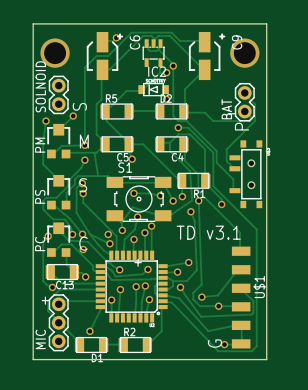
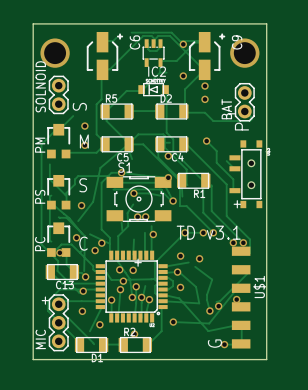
track: (131, 32) (108, 56) (96, 56) (84, 67) (84, 145) (61, 146) (51, 153) -> none
via: (116, 37) -> none
track: none -> (204, 42) (194, 42) (176, 61) (160, 62)
via: none -> (183, 44)
track: (158, 49) (173, 64) (173, 116) (178, 121) (186, 121) (206, 141) -> none
via: (173, 66) -> none
via: (166, 72) -> none
via: none -> (183, 76)
via: none -> (205, 86)
track: (244, 92) (255, 104) (255, 121) (226, 149) (226, 161) -> none
track: none -> (166, 99) (166, 132) (173, 139) (173, 151) (203, 181) (203, 212) (233, 242)
via: (166, 99) -> none
via: none -> (205, 99)
via position: (73, 116) -> (84, 126)
track: (46, 121) (43, 164) (58, 180) -> none
via: (46, 121) -> none
track: none -> (59, 127) (41, 144) (41, 244) (58, 261) (57, 270) (79, 292) (83, 291)
track: (178, 127) (188, 127) (213, 152) (213, 186) (256, 229) (256, 346) (251, 351) (218, 351) (171, 302) (163, 301) -> none
via: (178, 127) -> none
via: none -> (206, 141)
track: none -> (157, 144) (158, 157) (179, 179) (179, 206) (186, 206) (213, 232)
track: none -> (181, 144) (186, 144) (226, 184) (226, 216) (250, 239) (249, 253)
track: (183, 144) (184, 161) (198, 174) (198, 191) (240, 232) (241, 251) -> none
track: (94, 152) (98, 176) -> none
via: none -> (168, 156)
via position: (132, 159) -> (121, 172)
track: (84, 160) (81, 168) (68, 181) (68, 186) (56, 197) (46, 197) (43, 201) (43, 209) (53, 219) (64, 219) (71, 227) (72, 234) -> none
via: (84, 160) -> none
track: none -> (49, 164) (49, 179) (66, 195)
track: none -> (168, 177) (111, 172) (101, 182) (101, 229) (109, 237) (111, 254)
via: none -> (168, 177)
track: (82, 183) (76, 187) (76, 212) (98, 244) (111, 255) -> none
via: (82, 183) -> none
track: none -> (187, 185) (186, 169) (164, 147) (164, 136) (163, 134) (138, 134) (100, 167) (93, 201) (78, 221)
track: none -> (211, 185) (211, 211) (243, 242)
track: none -> (113, 189) (161, 189) (173, 202)
track: (83, 193) (83, 202) (116, 236) (117, 255) -> none
via: (83, 193) -> none
track: none -> (51, 195) (49, 196) (49, 241) (51, 241)
via: (160, 195) -> none
via: (182, 196) -> none
track: (198, 200) (201, 284) (193, 292) (193, 299) (200, 306) (241, 306) -> none
via: (198, 200) -> none
track: none -> (133, 204) (127, 213) (128, 226) (118, 236) (117, 254) (118, 262) (130, 279) (132, 297)
track: (221, 204) (221, 199) (206, 184) (205, 179) (205, 149) (189, 134) (178, 134) (169, 142) (169, 151) (189, 171) (192, 200) (171, 214) (161, 216) (132, 207) (121, 222) (114, 215) -> none
via: (221, 204) -> none
text: none -> + (237, 204)
via: none -> (81, 205)
track: (190, 211) (194, 221) (196, 270) (186, 281) (173, 281) -> none
via: (190, 211) -> none
track: (137, 216) (134, 229) (124, 239) (122, 255) -> none
via: none -> (145, 216)
track: none -> (58, 217) (66, 217) (84, 236) (84, 271)
via: (151, 226) -> none
track: (58, 228) (68, 240) (88, 241) (108, 262) (119, 269) -> none
via: (122, 230) -> none
via: (144, 232) -> none
via: none -> (184, 232)
track: none -> (203, 232) (184, 232) (154, 262) (154, 279) (158, 282)
via: none -> (203, 232)
via: none -> (213, 232)
via: (72, 234) -> none
via: (82, 234) -> none
via: (108, 234) -> none
via: none -> (153, 234)
track: (48, 236) (43, 241) (43, 281) (52, 287) -> none
via: (48, 236) -> none
via: none -> (76, 237)
via: (134, 239) -> none
via: none -> (233, 242)
via: none -> (243, 242)
via: none -> (101, 243)
via: (109, 243) -> none
via: (83, 249) -> none
via: none -> (95, 250)
via: none -> (59, 252)
via: none -> (180, 256)
via: none -> (199, 258)
via: (188, 262) -> none
track: (100, 266) (111, 270) (115, 276) (142, 274) (147, 269) -> none
track: none -> (195, 266) (212, 279) (207, 294) (209, 311)
via: (147, 269) -> none
track: (241, 269) (237, 269) (217, 295) (201, 297) -> none
via: none -> (133, 270)
track: none -> (249, 271) (220, 301) (216, 301)
track: none -> (180, 273) (196, 286) (199, 303) (163, 300)
via: none -> (123, 281)
via: (145, 285) -> none
via: (52, 287) -> none
track: (180, 287) (201, 316) (251, 314) (253, 301) (241, 288) -> none
track: none -> (249, 290) (235, 291) (209, 323) (173, 322)
via: none -> (83, 291)
via: none -> (132, 297)
via: none -> (141, 297)
via position: (201, 297) -> (209, 311)
via: none -> (236, 299)
via: none -> (82, 311)
track: none -> (66, 317) (94, 344)
via: none -> (173, 322)
via: none -> (99, 324)
via: (89, 331) -> none
via: none -> (134, 334)

